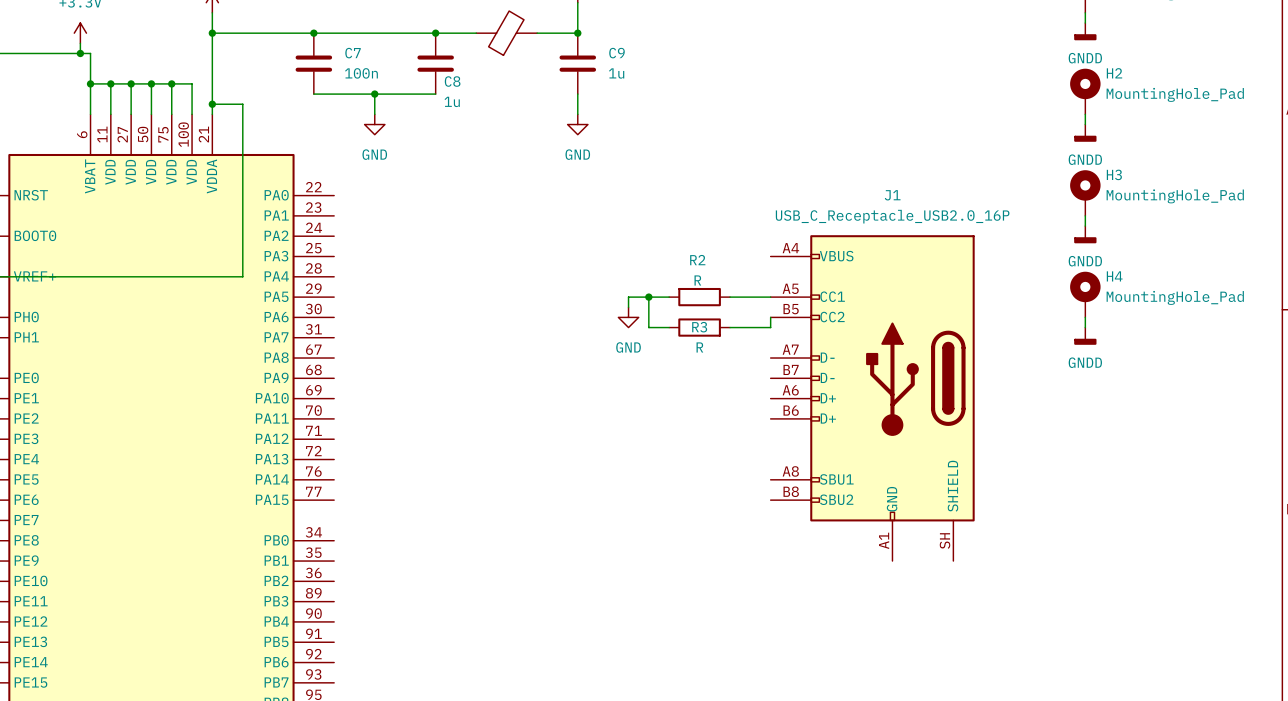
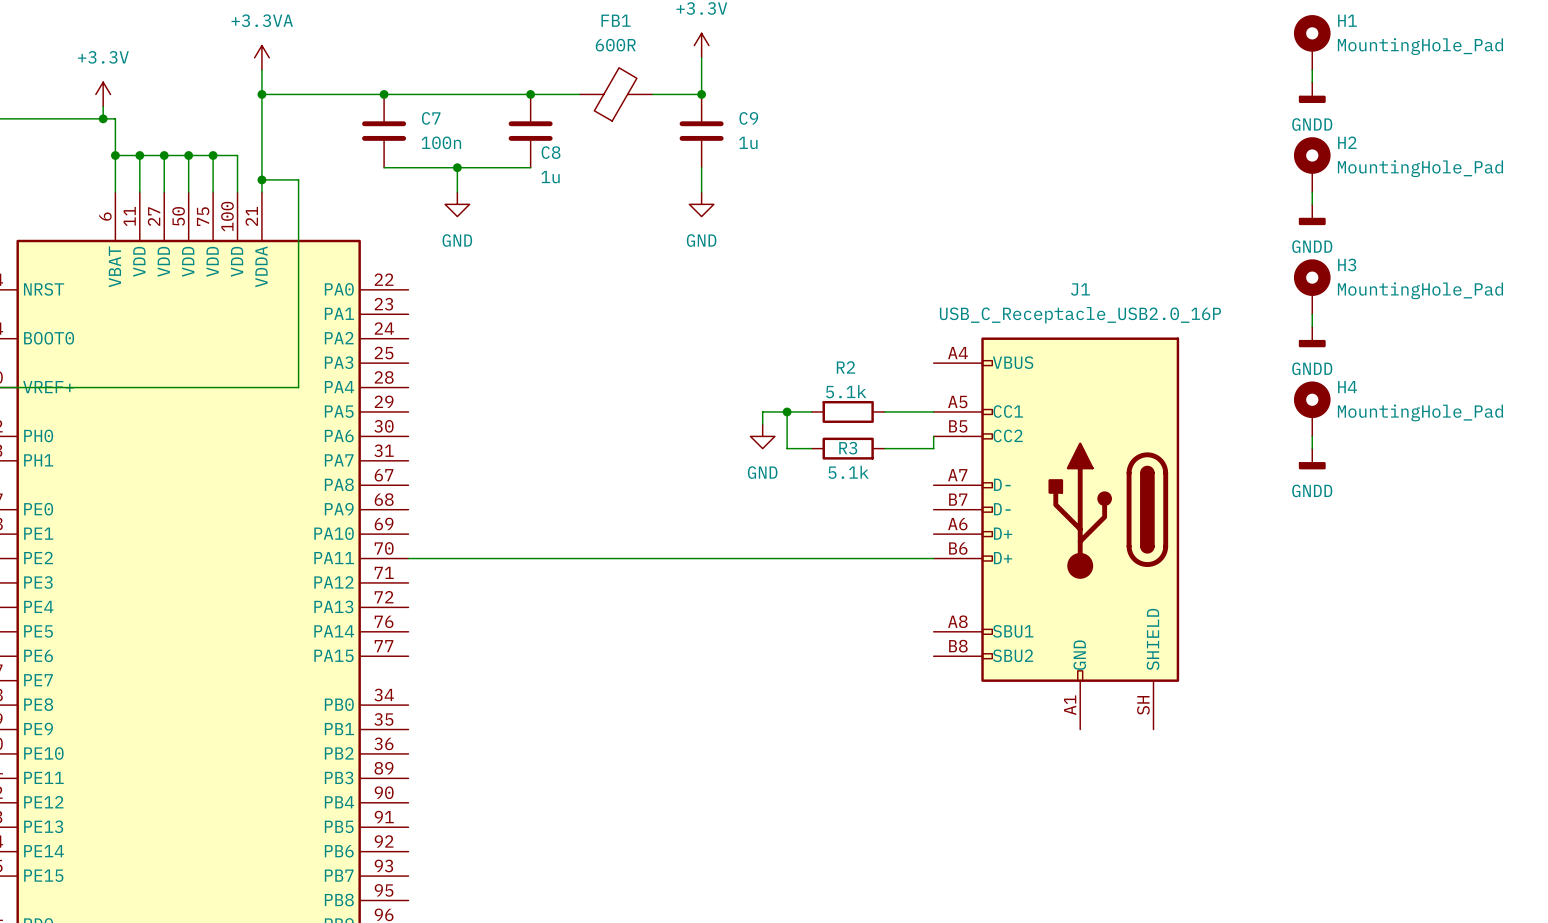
R2 value: R (697, 280) -> 5.1k (846, 391)
R3 value: R (699, 347) -> 5.1k (848, 472)
wire: none -> (408, 558) (933, 558)

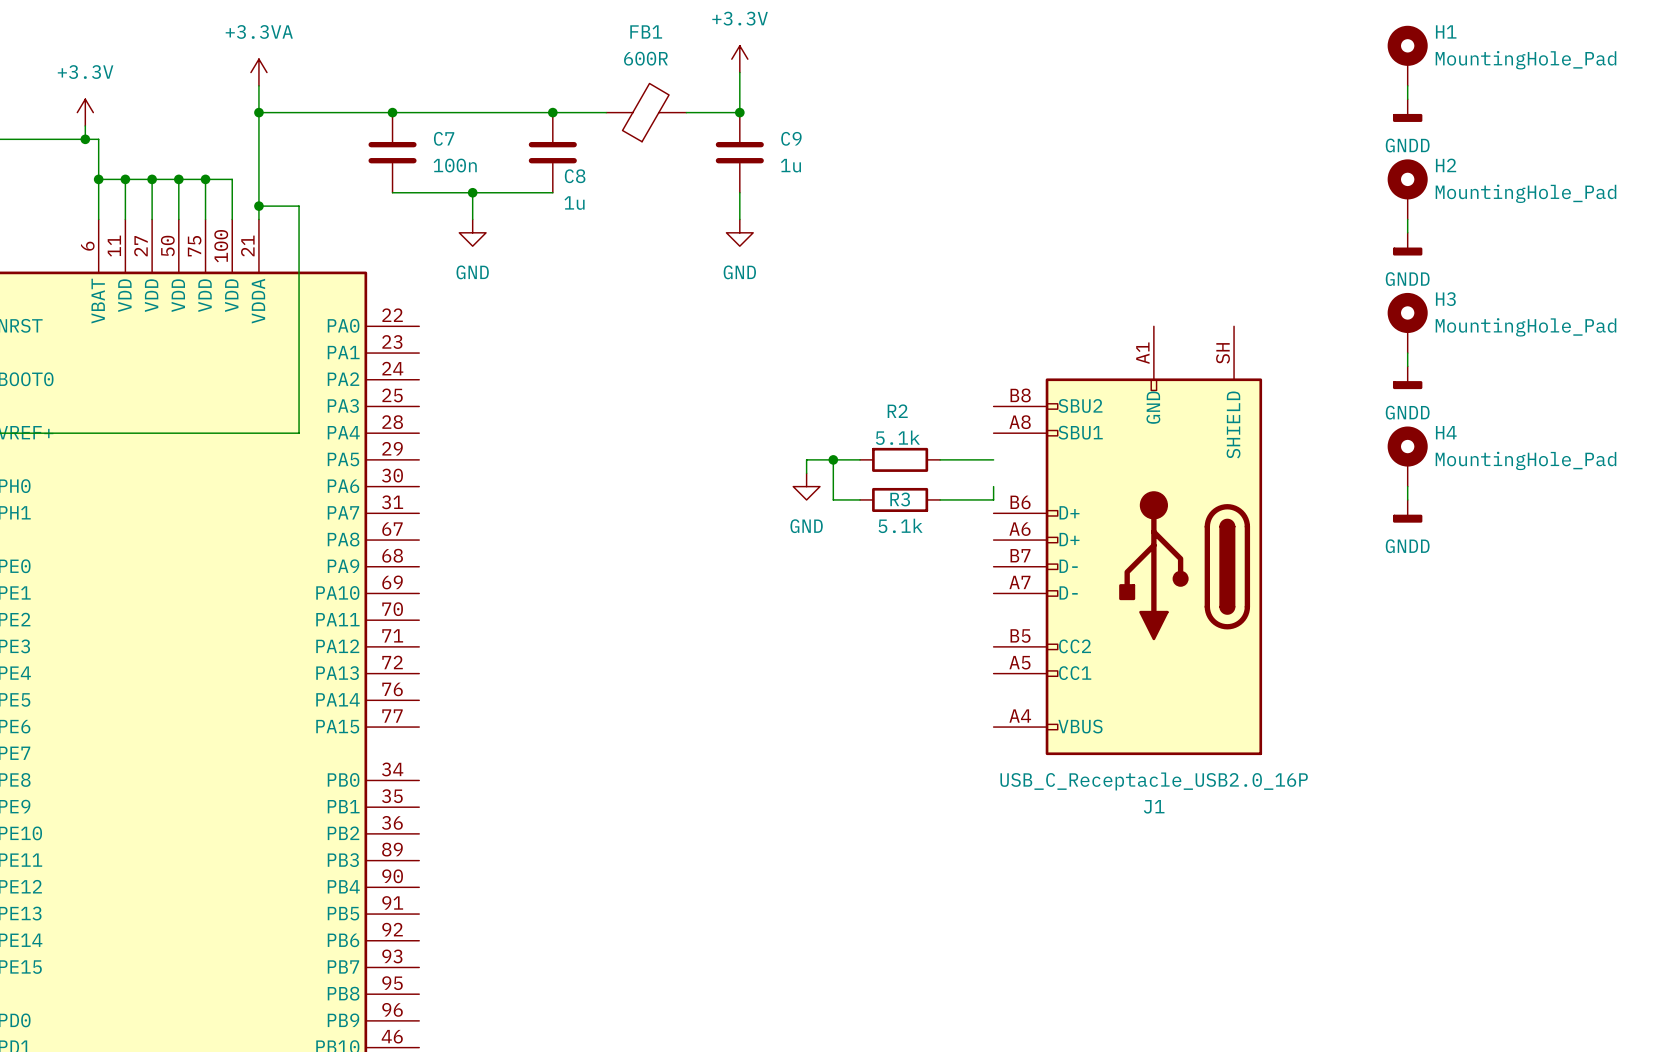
J1 flip: as is (1080, 509) -> up-down (1153, 566)
wire: (408, 558) (933, 558) -> none

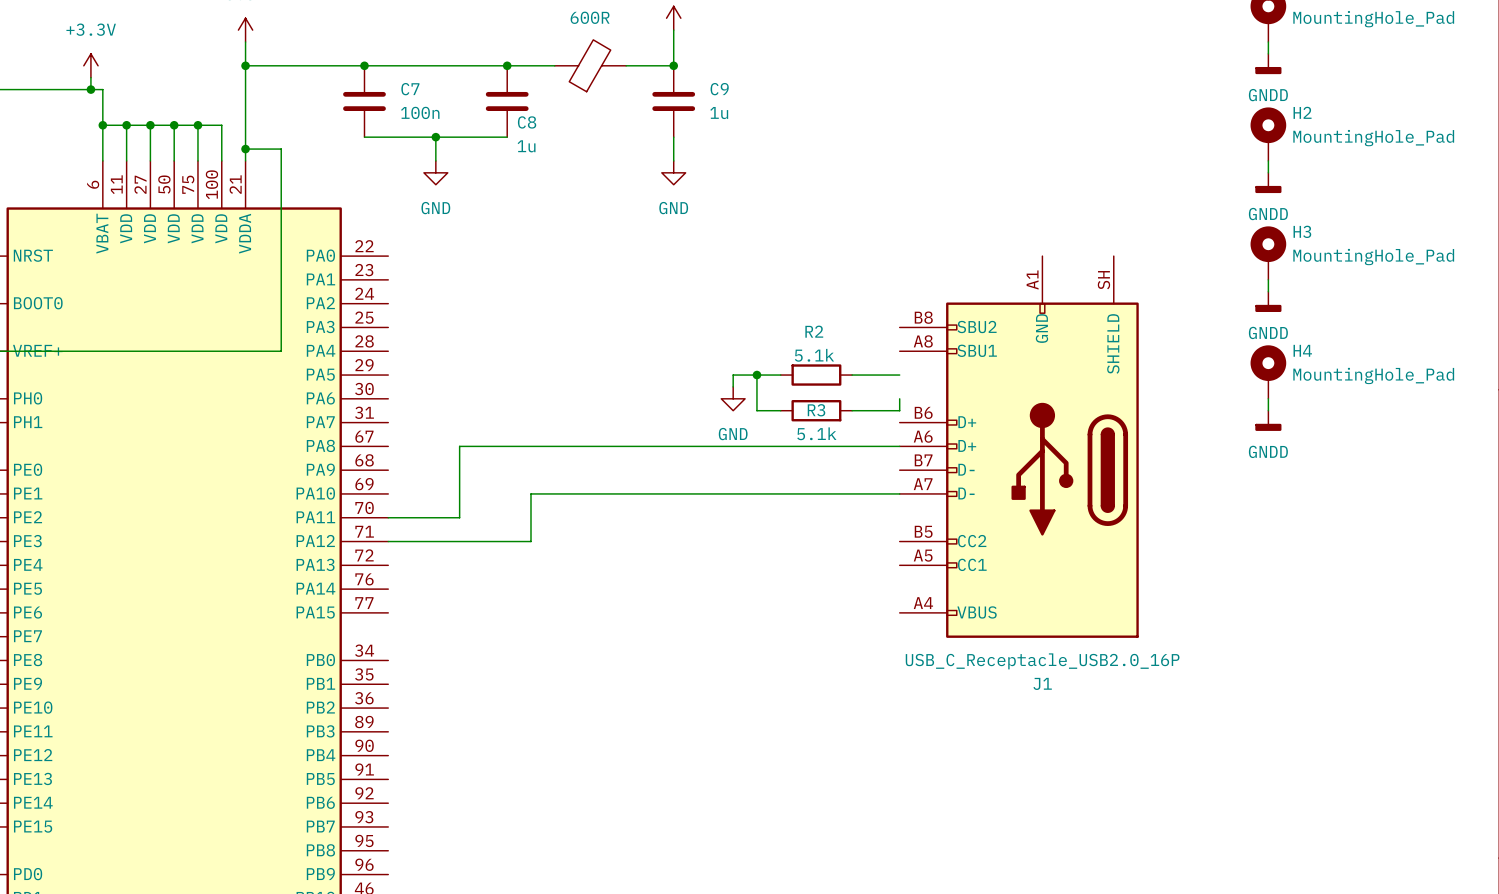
wire: none -> (899, 446) (459, 446) (459, 517) (388, 517)
wire: none -> (899, 493) (530, 493) (530, 541) (388, 541)

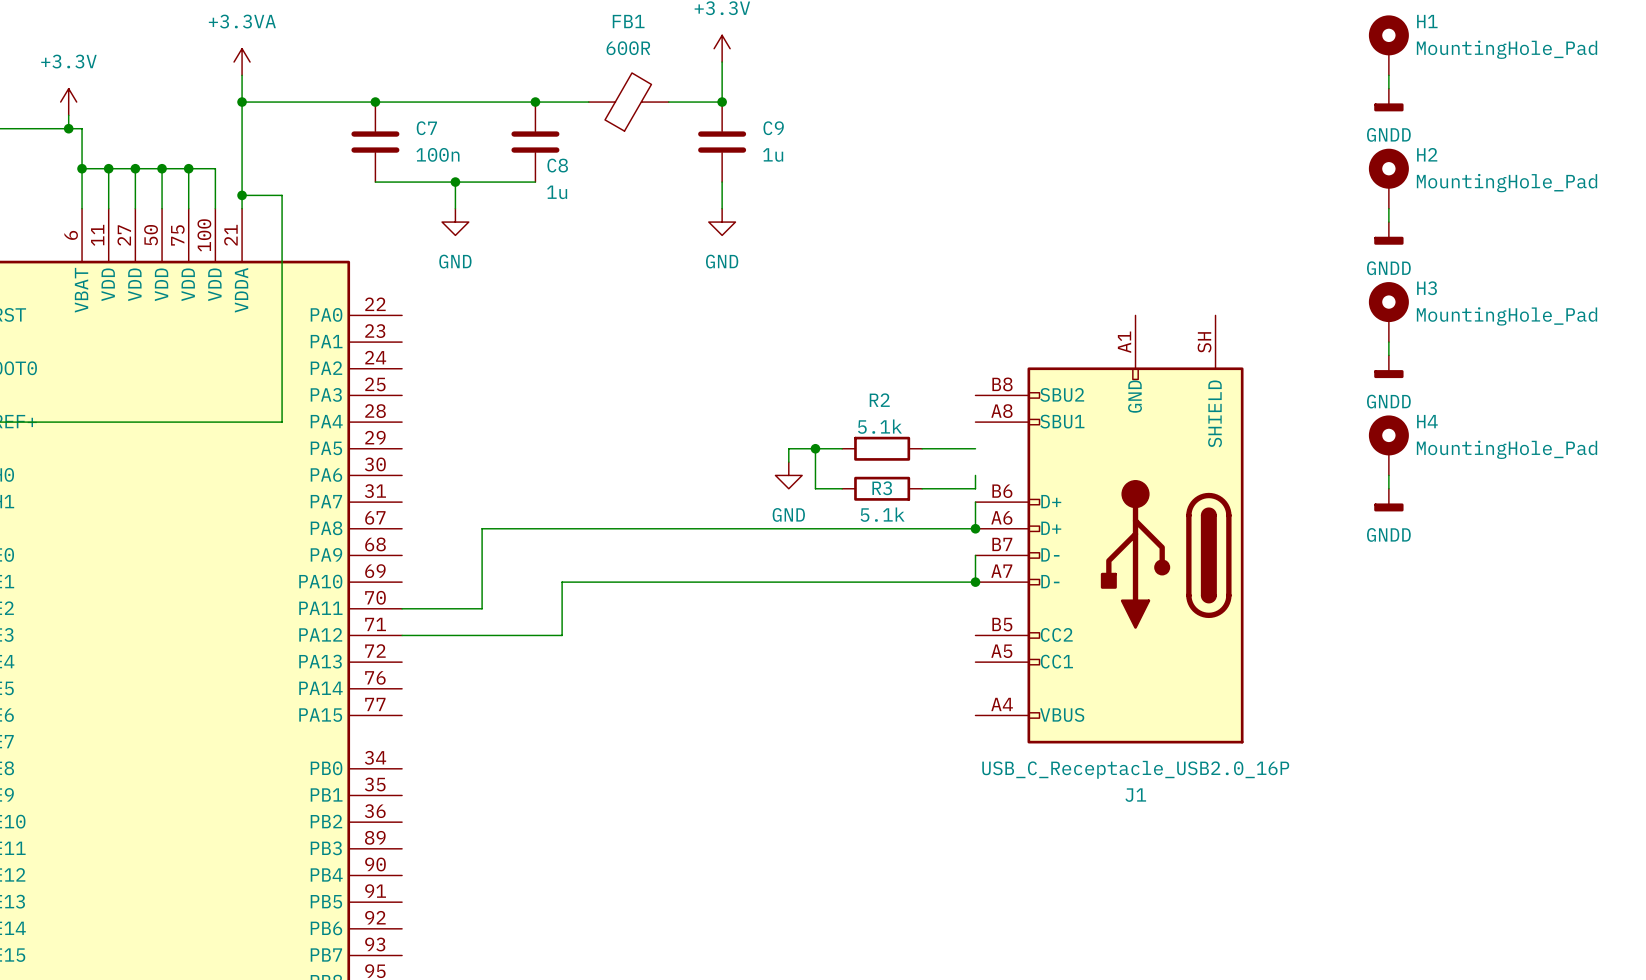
wire: none -> (975, 502) (975, 528)
junction: none -> (975, 528)
wire: none -> (975, 555) (975, 582)
junction: none -> (975, 582)

